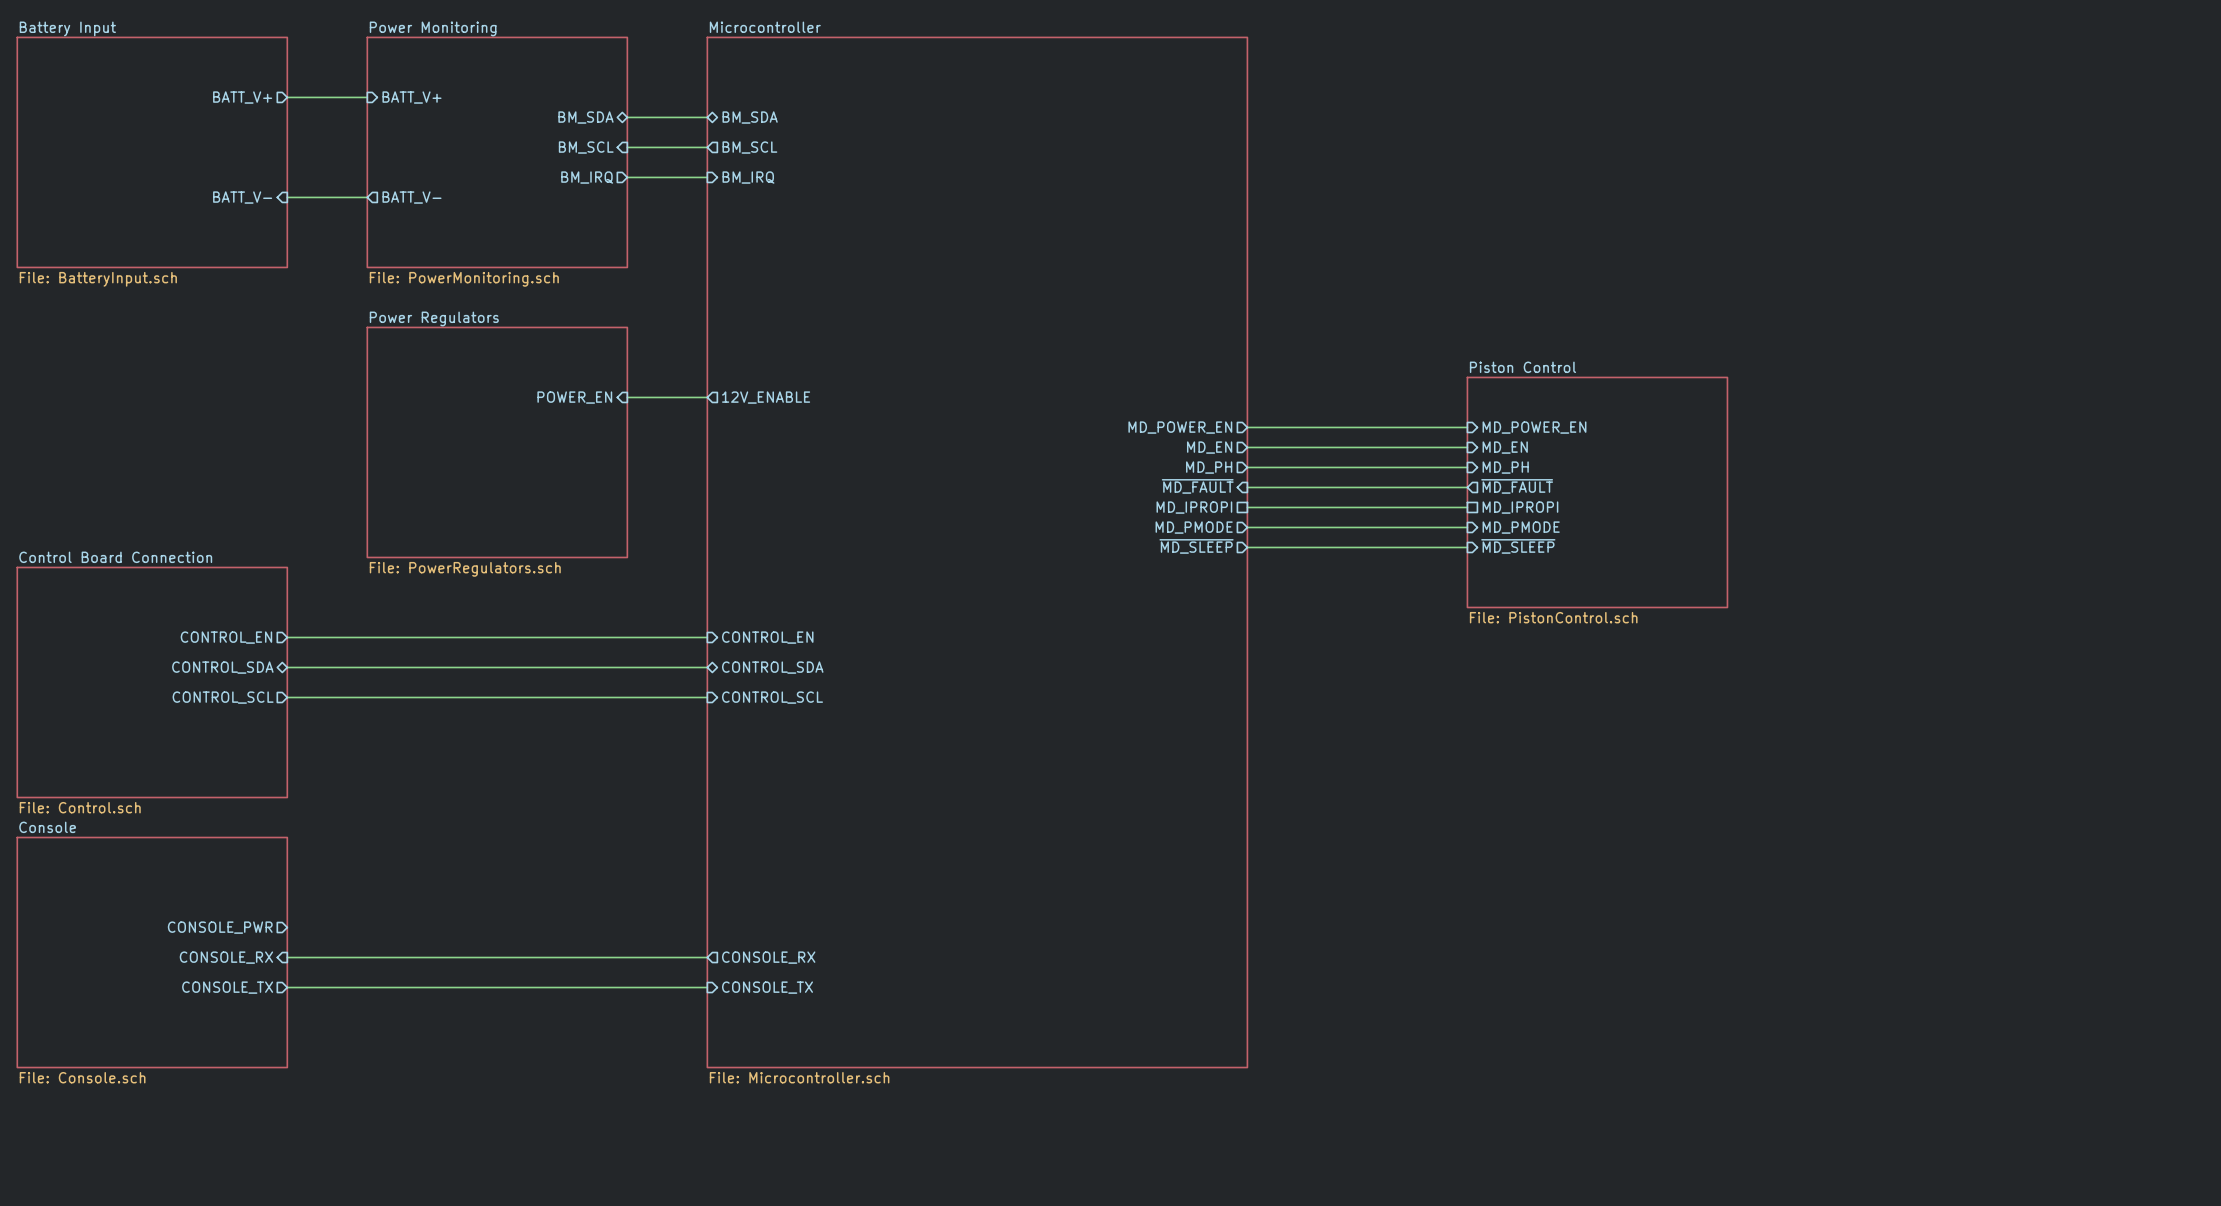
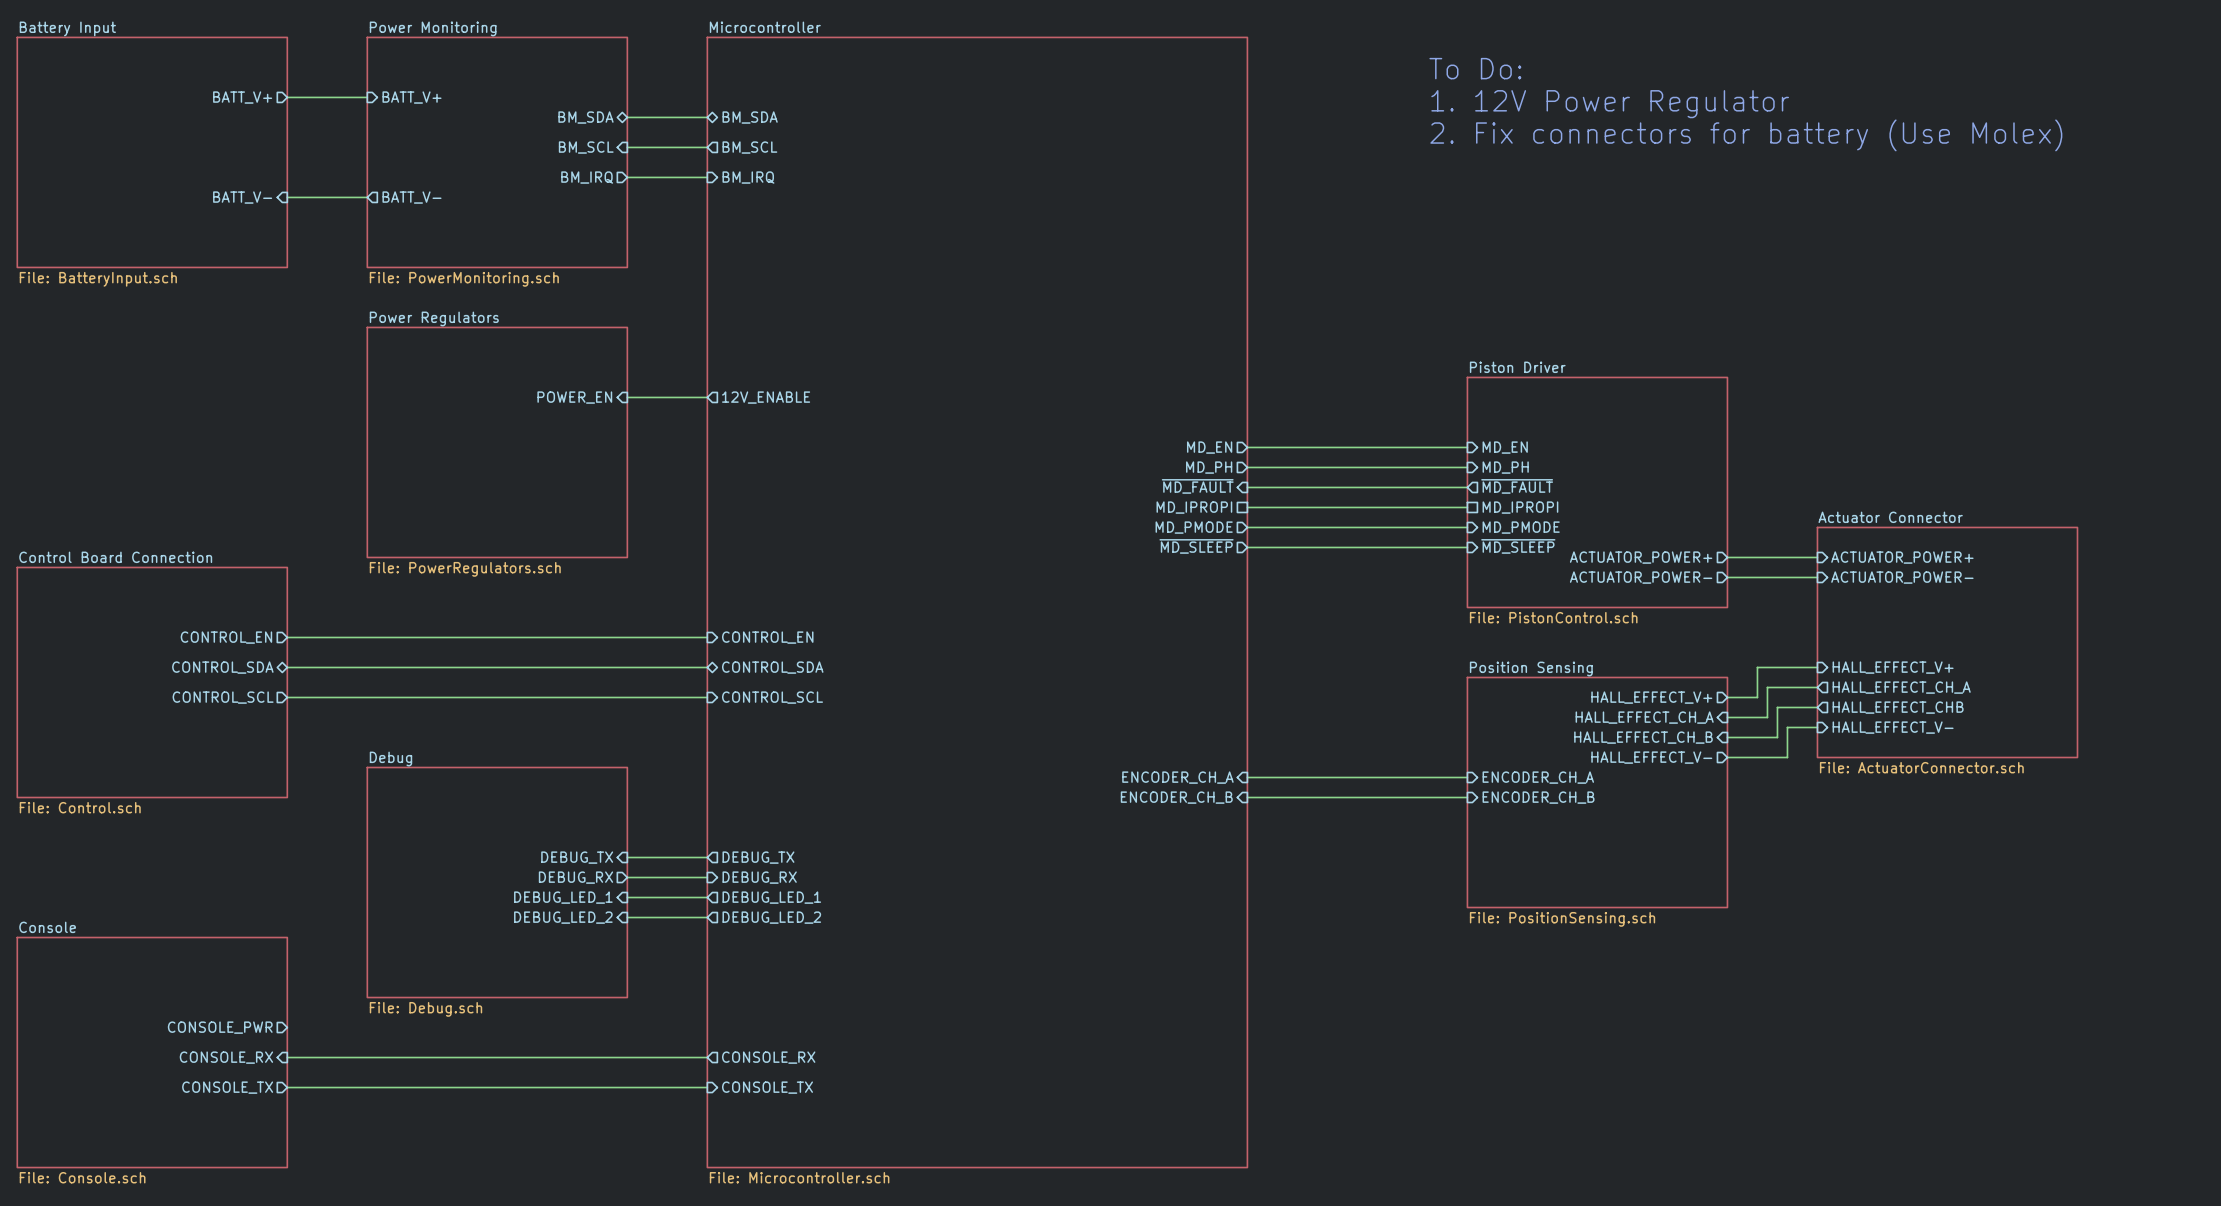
text: none -> To Do: (1475, 68)
text: none -> 1. 12V Power Regulator (1610, 104)
text: none -> 2. Fix connectors for battery (Use Molex) (1746, 135)
sheet Piston Control name: Piston Control (1522, 367) -> Piston Driver (1517, 367)
sheet pin: MD_POWER_EN (1180, 427) -> none
wire: (1247, 427) (1467, 427) -> none
sheet pin: MD_POWER_EN (1534, 427) -> none
sheet Microcontroller: File: Microcontroller.sch (977, 552) -> none
sheet pin: none -> ACTUATOR_POWER+ (1641, 557)
wire: none -> (1727, 557) (1817, 557)
sheet pin: none -> ACTUATOR_POWER+ (1902, 557)
sheet pin: none -> ACTUATOR_POWER- (1641, 577)
wire: none -> (1727, 577) (1817, 577)
sheet pin: none -> ACTUATOR_POWER- (1902, 577)
sheet Microcontroller: none -> File: Microcontroller.sch (977, 602)
sheet Actuator Connector: none -> File: ActuatorConnector.sch (1947, 642)
wire: none -> (1817, 667) (1757, 667) (1757, 697) (1727, 697)
sheet pin: none -> HALL_EFFECT_V+ (1893, 667)
wire: none -> (1817, 687) (1767, 687) (1767, 717) (1727, 717)
sheet pin: none -> HALL_EFFECT_CH_A (1901, 687)
sheet pin: none -> HALL_EFFECT_V+ (1651, 697)
wire: none -> (1817, 707) (1777, 707) (1777, 737) (1727, 737)
sheet pin: none -> HALL_EFFECT_CHB (1898, 707)
sheet pin: none -> HALL_EFFECT_CH_A (1644, 717)
wire: none -> (1817, 727) (1787, 727) (1787, 757) (1727, 757)
sheet pin: none -> HALL_EFFECT_V- (1893, 727)
sheet pin: none -> HALL_EFFECT_CH_B (1643, 737)
sheet pin: none -> HALL_EFFECT_V- (1651, 757)
sheet pin: none -> ENCODER_CH_A (1177, 777)
wire: none -> (1247, 777) (1467, 777)
sheet pin: none -> ENCODER_CH_A (1538, 777)
sheet Position Sensing: none -> File: PositionSensing.sch (1597, 792)
sheet pin: none -> ENCODER_CH_B (1176, 797)
wire: none -> (1247, 797) (1467, 797)
sheet pin: none -> ENCODER_CH_B (1538, 797)
sheet pin: none -> DEBUG_TX (577, 857)
wire: none -> (627, 857) (707, 857)
sheet pin: none -> DEBUG_TX (758, 857)
sheet pin: none -> DEBUG_RX (575, 877)
wire: none -> (627, 877) (707, 877)
sheet pin: none -> DEBUG_RX (759, 877)
sheet Debug: none -> File: Debug.sch (497, 882)
sheet pin: none -> DEBUG_LED_1 (563, 897)
wire: none -> (627, 897) (707, 897)
sheet pin: none -> DEBUG_LED_1 (771, 897)
sheet pin: none -> DEBUG_LED_2 (563, 917)
wire: none -> (627, 917) (707, 917)
sheet pin: none -> DEBUG_LED_2 (771, 917)
sheet pin position: CONSOLE_PWR (220, 927) -> CONSOLE_PWR (220, 1027)
sheet Console position: (152, 952) -> (152, 1052)
sheet pin position: CONSOLE_RX (226, 957) -> CONSOLE_RX (226, 1057)
wire: (287, 957) (707, 957) -> (287, 1057) (707, 1057)
sheet pin position: CONSOLE_RX (768, 957) -> CONSOLE_RX (768, 1057)
sheet pin position: CONSOLE_TX (227, 987) -> CONSOLE_TX (227, 1087)
wire: (287, 987) (707, 987) -> (287, 1087) (707, 1087)
sheet pin position: CONSOLE_TX (767, 987) -> CONSOLE_TX (767, 1087)

